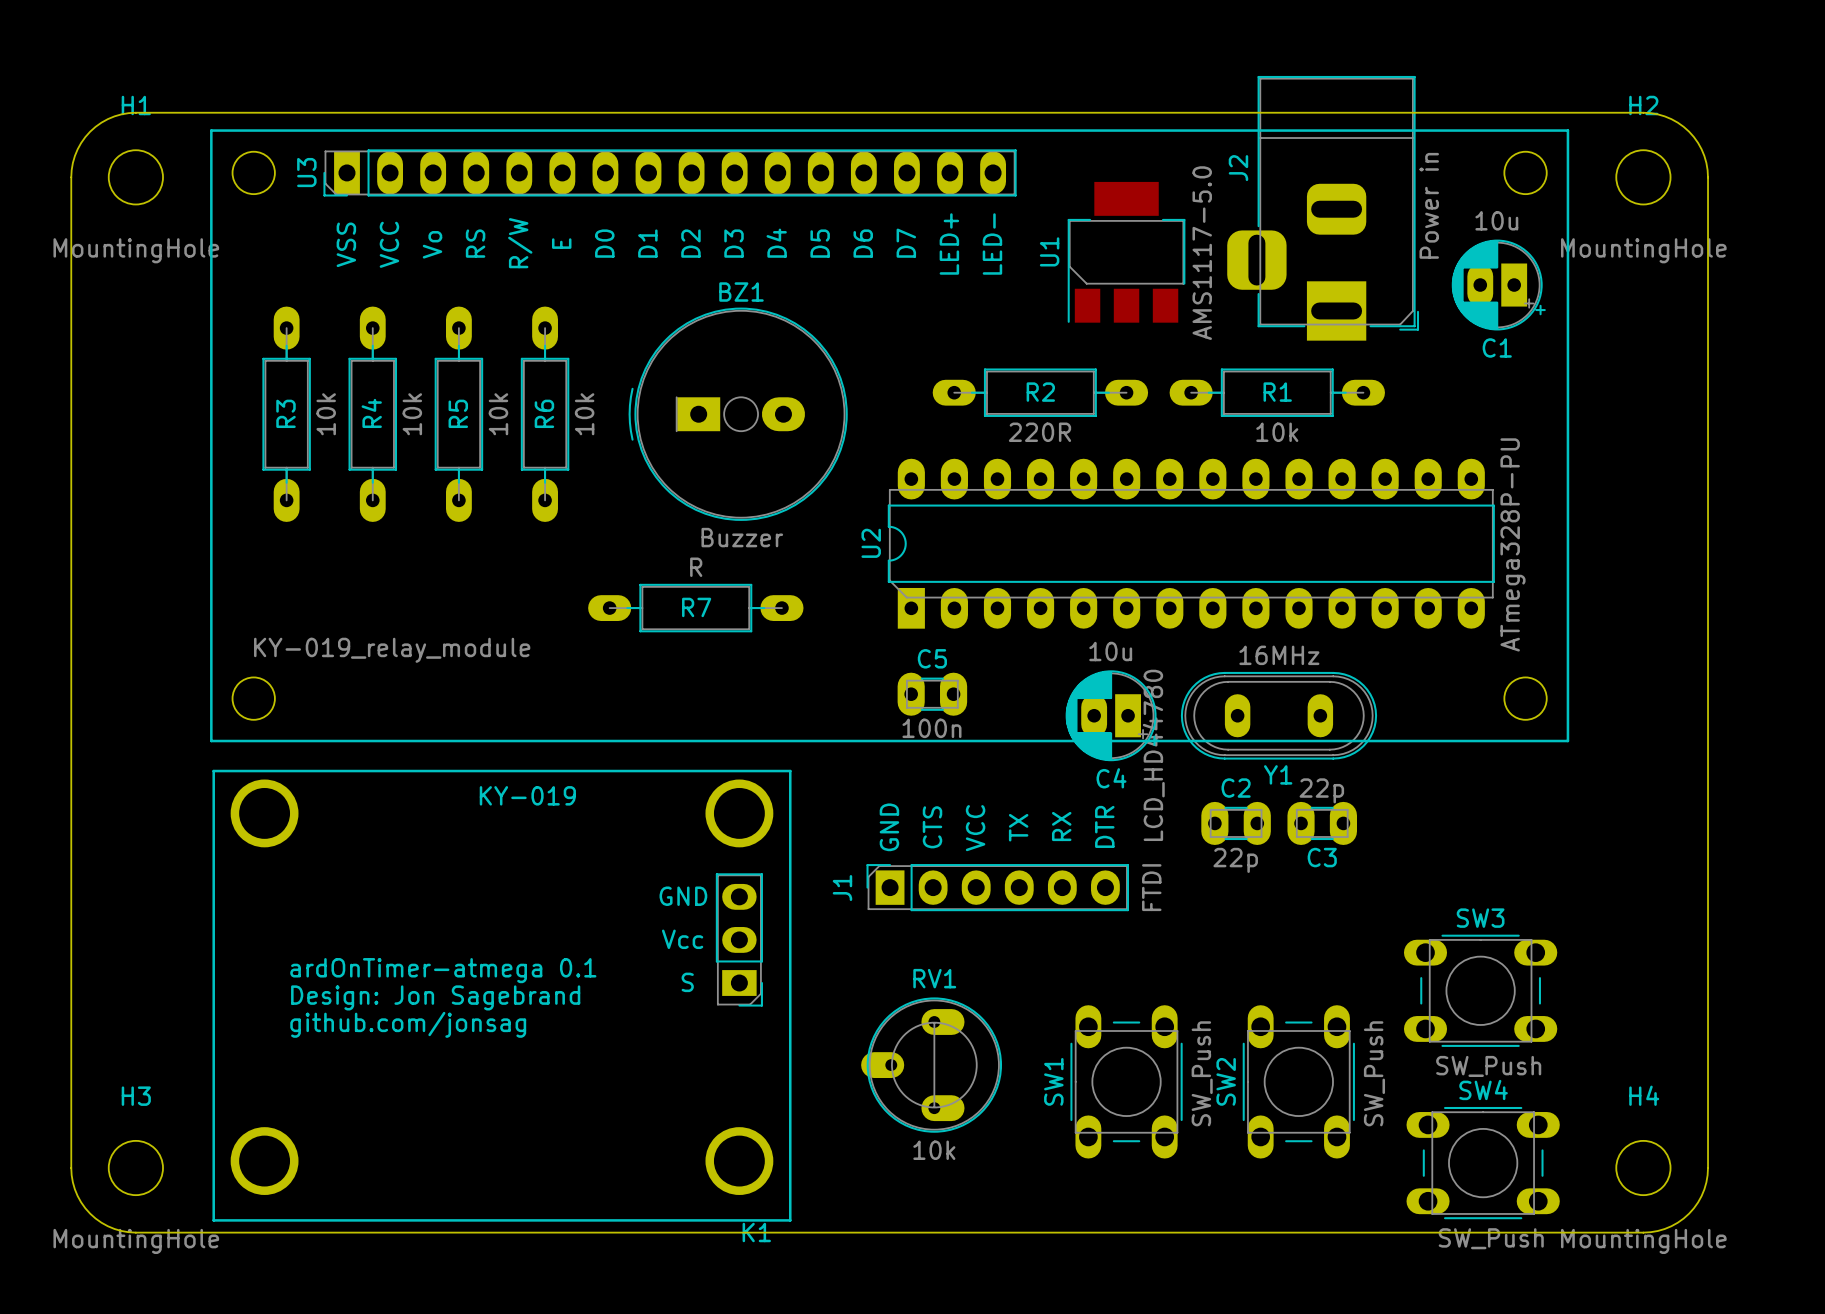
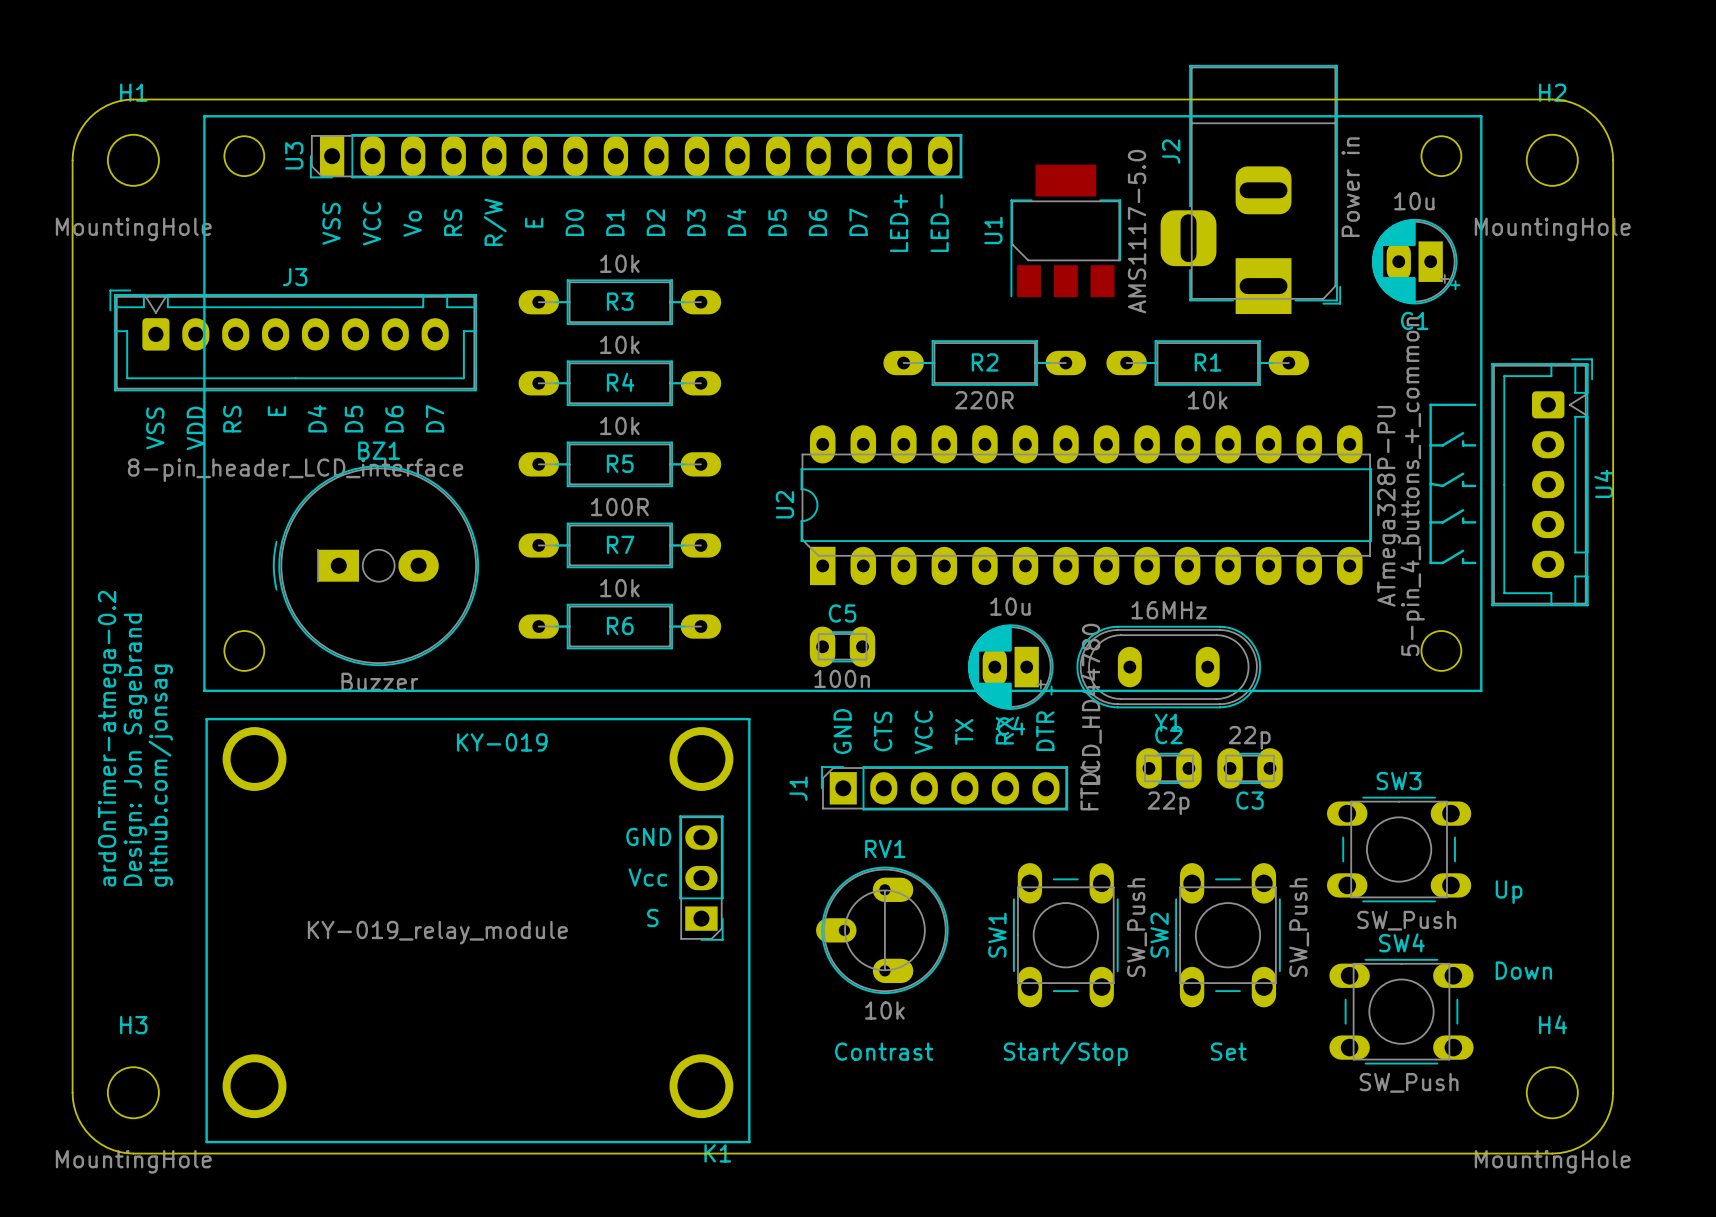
J3: none -> 8-pin_header_LCD_interface (293, 340)
R3 rotation: 0° (286, 414) -> 90° clockwise (619, 302)
R3 position: (286, 414) -> (619, 302)
R3 value position: 10k (326, 414) -> 10k (619, 263)
R4 rotation: 0° (372, 414) -> 90° clockwise (619, 383)
R4 position: (372, 414) -> (619, 383)
R4 value position: 10k (412, 414) -> 10k (619, 344)
R5 rotation: 0° (458, 414) -> 90° clockwise (619, 464)
R5 position: (458, 414) -> (619, 464)
R5 value position: 10k (498, 414) -> 10k (619, 425)
R6 rotation: 0° (545, 414) -> 90° clockwise (619, 626)
R6 position: (545, 414) -> (619, 626)
R6 value position: 10k (584, 414) -> 10k (619, 588)
BZ1 position: (738, 414) -> (375, 565)
U4: none -> 5-pin_4_buttons_+_common (1511, 482)
U2 position: (1191, 543) -> (1086, 505)
R7 value: R (696, 567) -> 100R (619, 507)
R7 position: (695, 608) -> (619, 545)
K1 value position: KY-019_relay_module (392, 650) -> KY-019_relay_module (437, 932)
C5 position: (932, 694) -> (842, 646)
C4 position: (1112, 715) -> (1012, 667)
Y1 position: (1278, 715) -> (1168, 667)
text: none -> ardOnTimer-atmega-0.2 (109, 738)
J1 position: (997, 887) -> (944, 788)
text: none -> Up (1509, 892)
text: ardOnTimer-atmega 0.1 (443, 970) -> none
SW3 position: (1480, 990) -> (1399, 849)
text rotation: 0° (435, 997) -> 90° counterclockwise (135, 749)
text position: Design: Jon Sagebrand (435, 997) -> Design: Jon Sagebrand (135, 749)
text rotation: 0° (408, 1024) -> 90° counterclockwise (160, 775)
text position: github.com/jonsag (408, 1024) -> github.com/jonsag (160, 775)
text: none -> Down (1523, 970)
RV1 position: (931, 1065) -> (882, 930)
SW1 position: (1126, 1081) -> (1065, 935)
SW2 position: (1298, 1081) -> (1227, 935)
text: none -> Contrast (884, 1051)
text: none -> Set (1228, 1051)
text: none -> Start/Stop (1065, 1053)
SW4 position: (1483, 1163) -> (1401, 1011)

